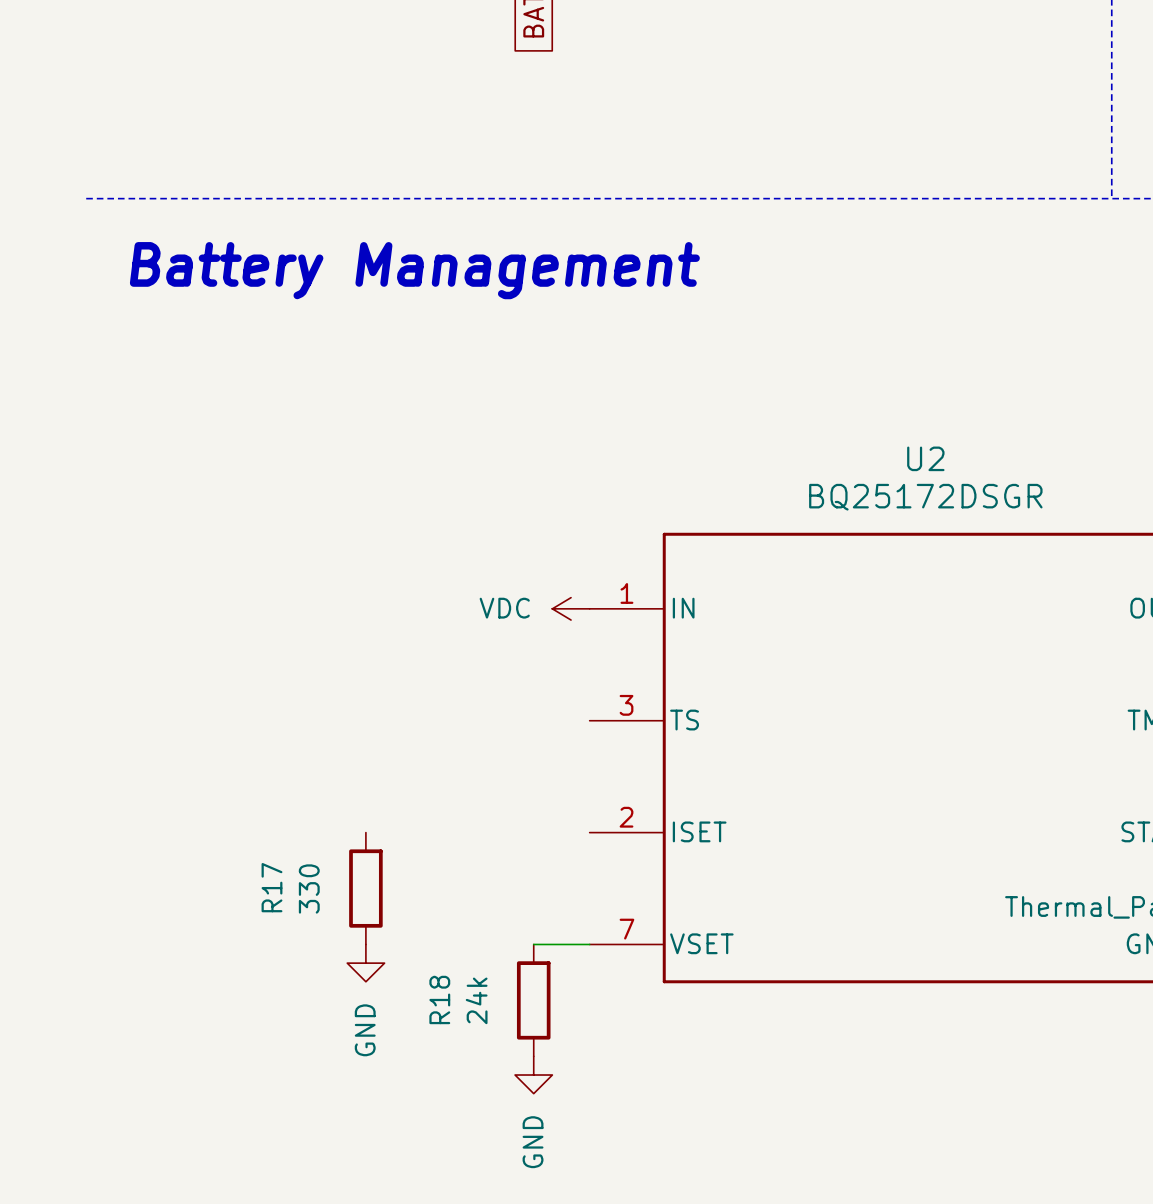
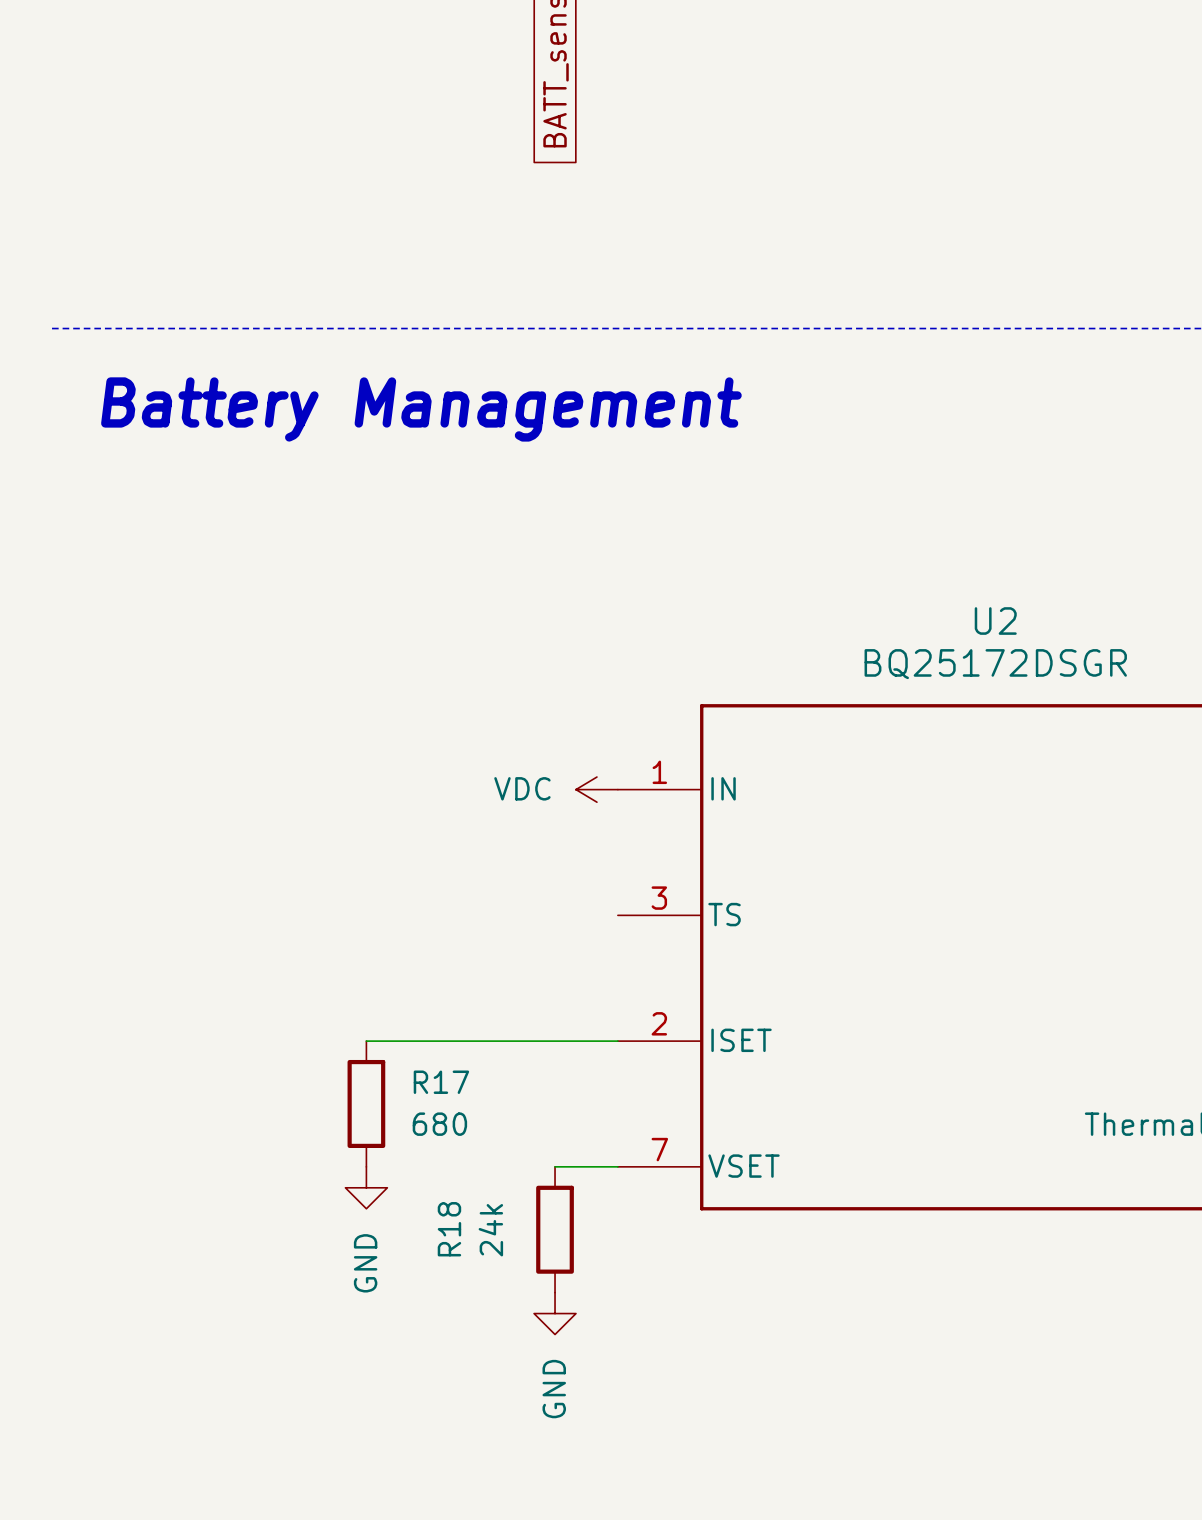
wire: none -> (366, 1041) (617, 1041)
R17 name rotation: 0° (271, 887) -> 90° clockwise (441, 1082)
R17 name position: R17 (271, 887) -> R17 (441, 1082)
R17 value: 330 (309, 888) -> 680 (439, 1124)

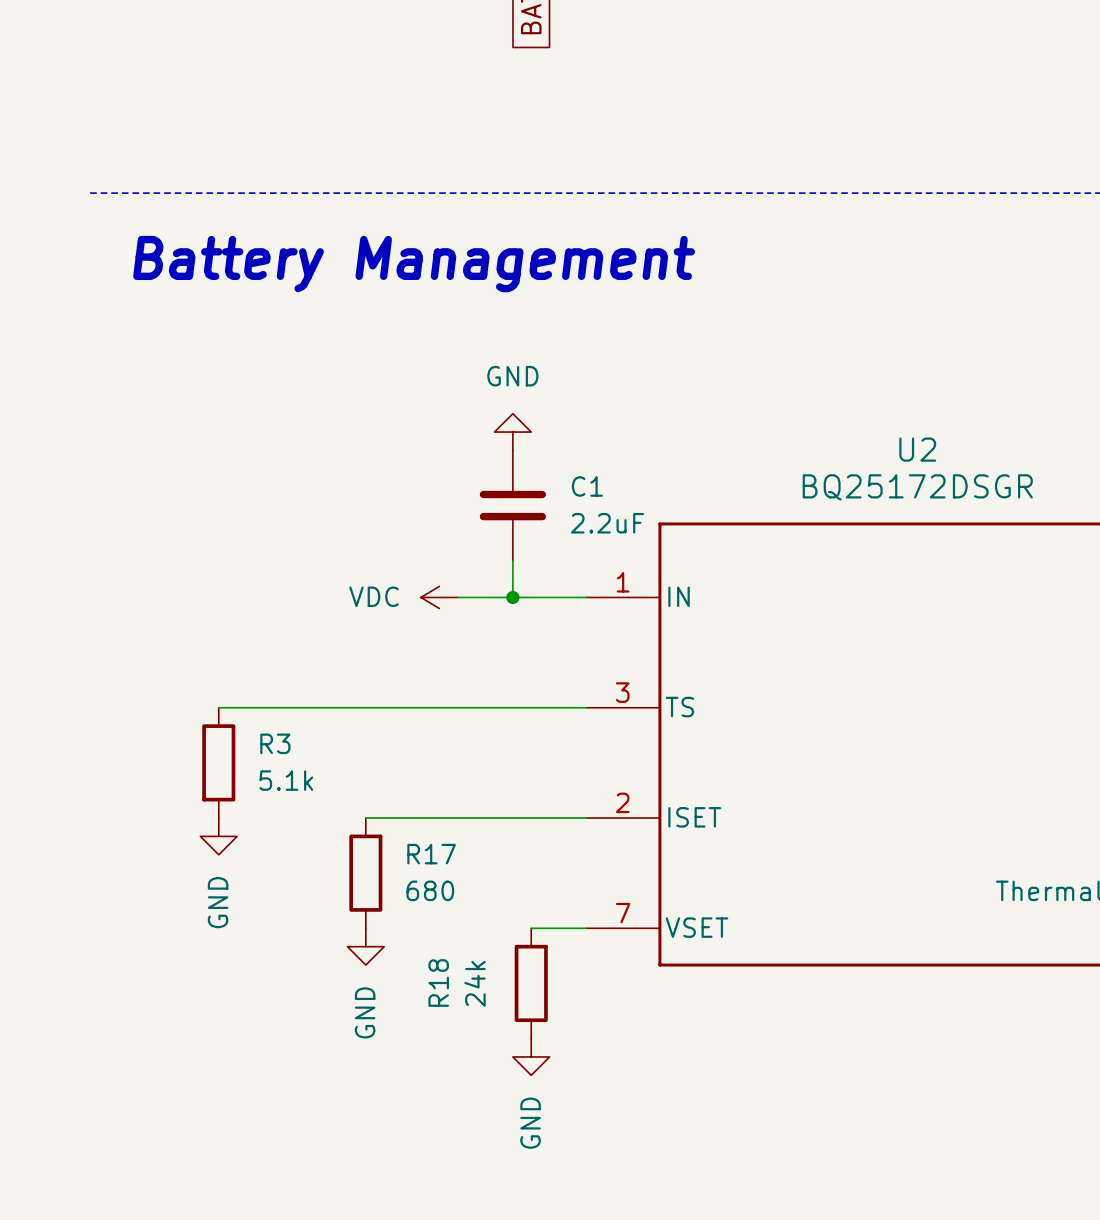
power symbol: none -> GND (512, 432)
C1: none -> 2.2uF (512, 505)
wire: none -> (512, 560) (512, 597)
wire: none -> (457, 597) (586, 597)
junction: none -> (512, 597)
power symbol position: VDC (596, 789) -> VDC (439, 597)
wire: none -> (218, 707) (586, 707)
R3: none -> 5.1k (218, 762)
power symbol: none -> GND (218, 836)

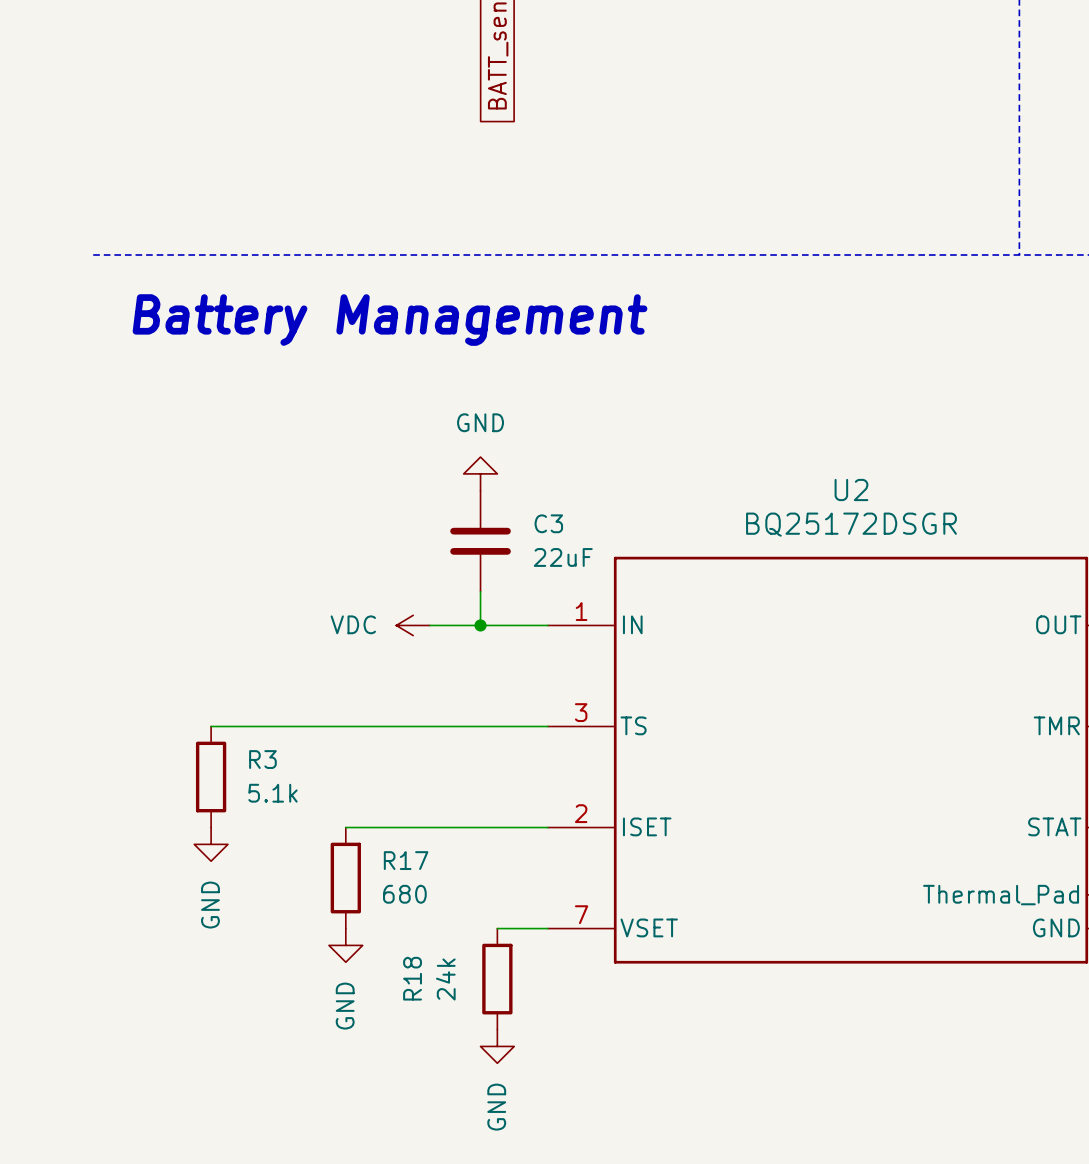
C1 name: C1 (587, 486) -> C3 (548, 523)
C1 value: 2.2uF (607, 523) -> 22uF (563, 557)

